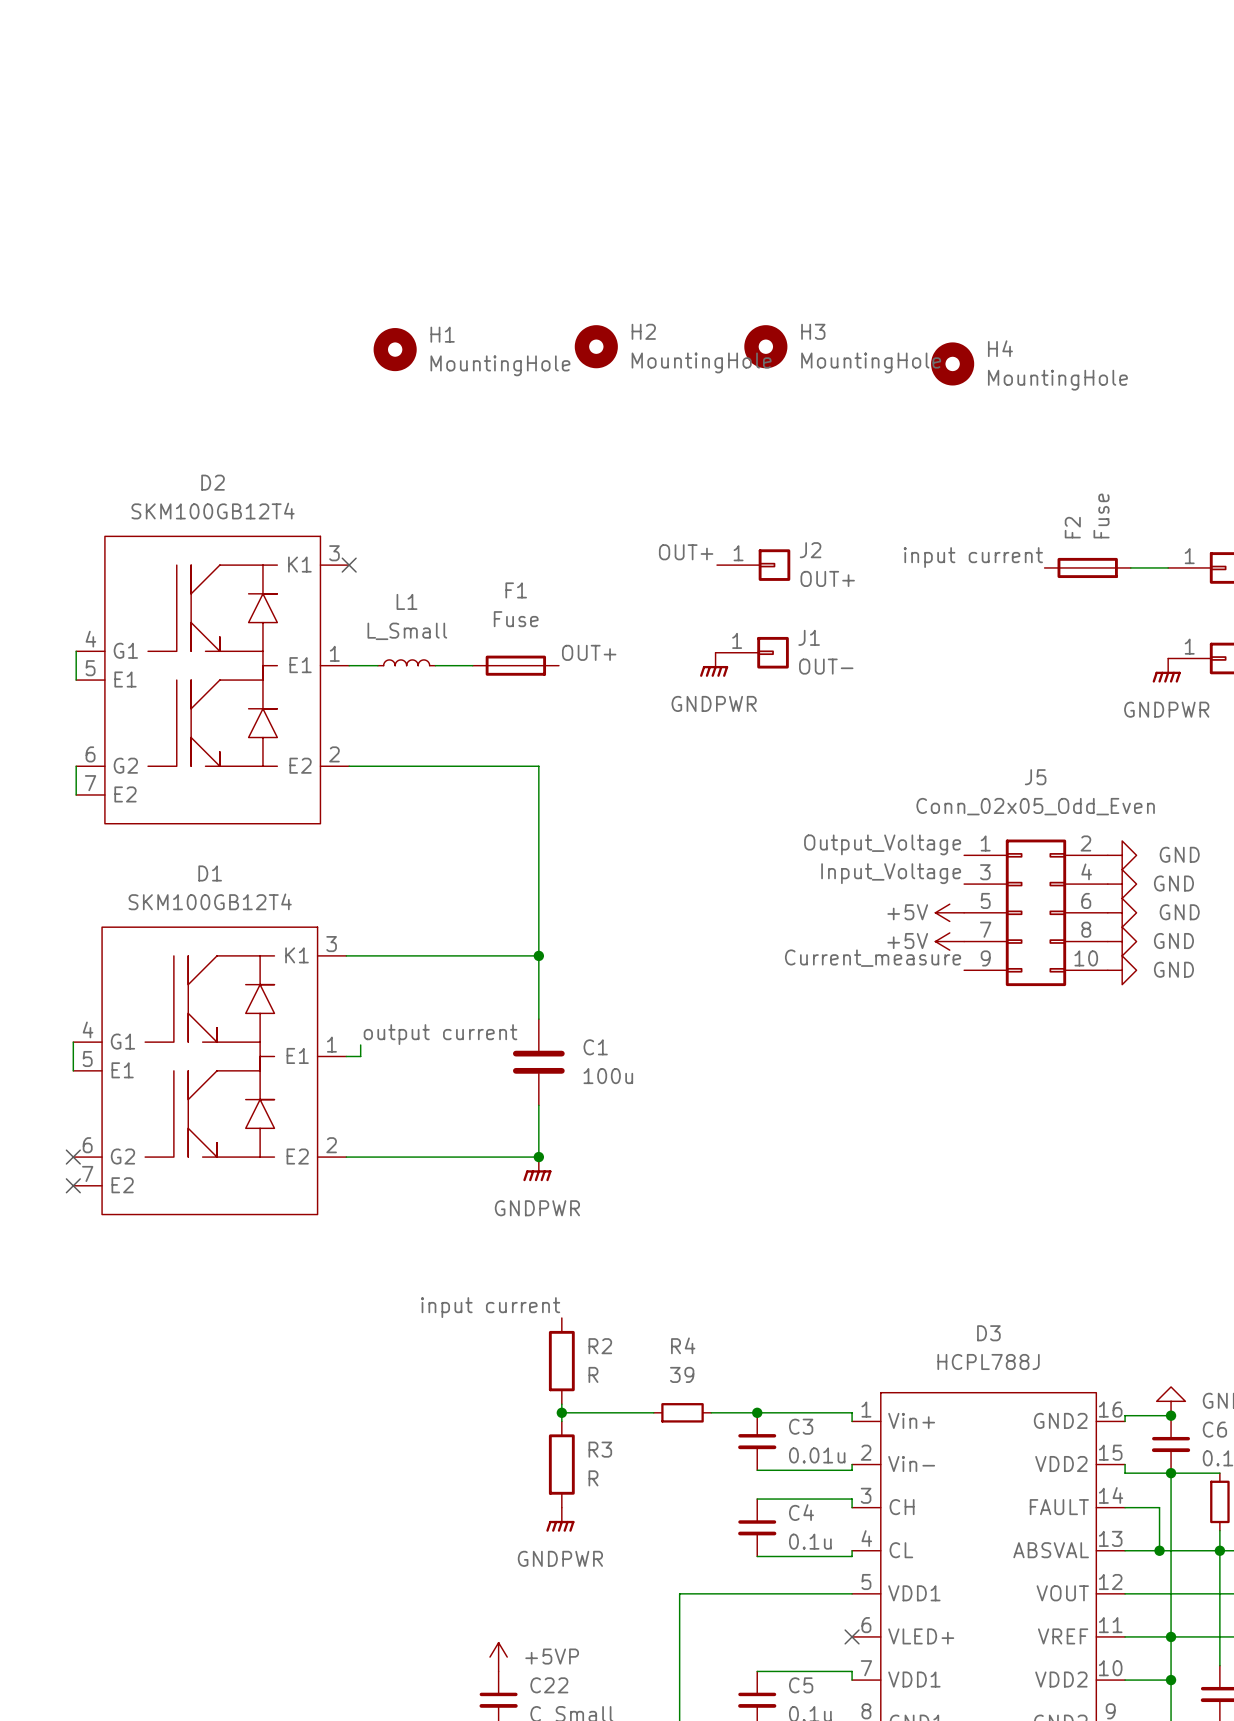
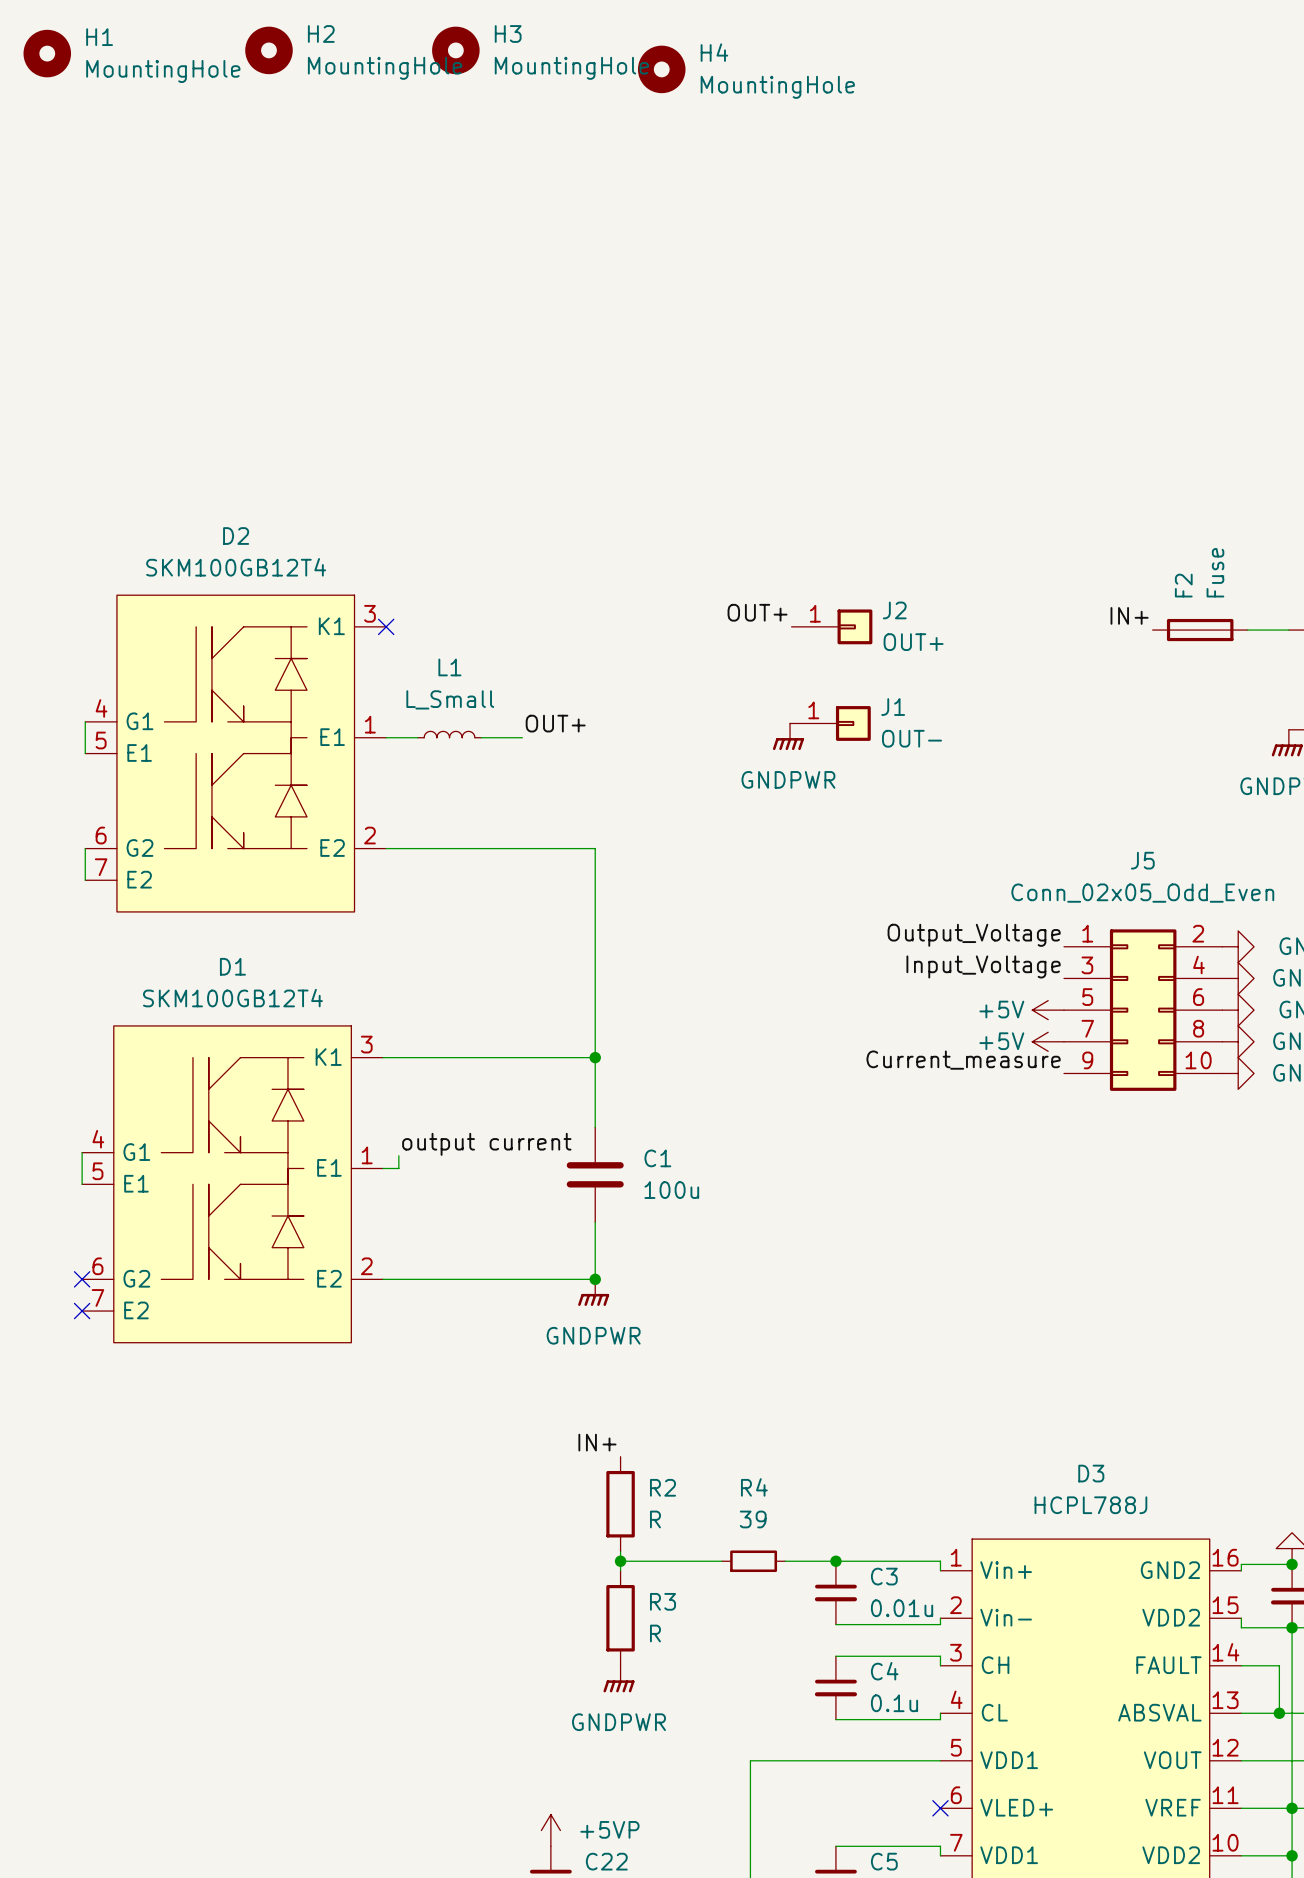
H2 position: (596, 346) -> (268, 50)
H3 position: (765, 346) -> (455, 50)
H1 position: (395, 349) -> (47, 53)
H4 position: (952, 363) -> (661, 69)
label: input current (973, 557) -> IN+ (1129, 615)
label position: OUT+ (589, 652) -> OUT+ (555, 723)
F1: Fuse (515, 665) -> none
label: input current (490, 1307) -> IN+ (597, 1442)

